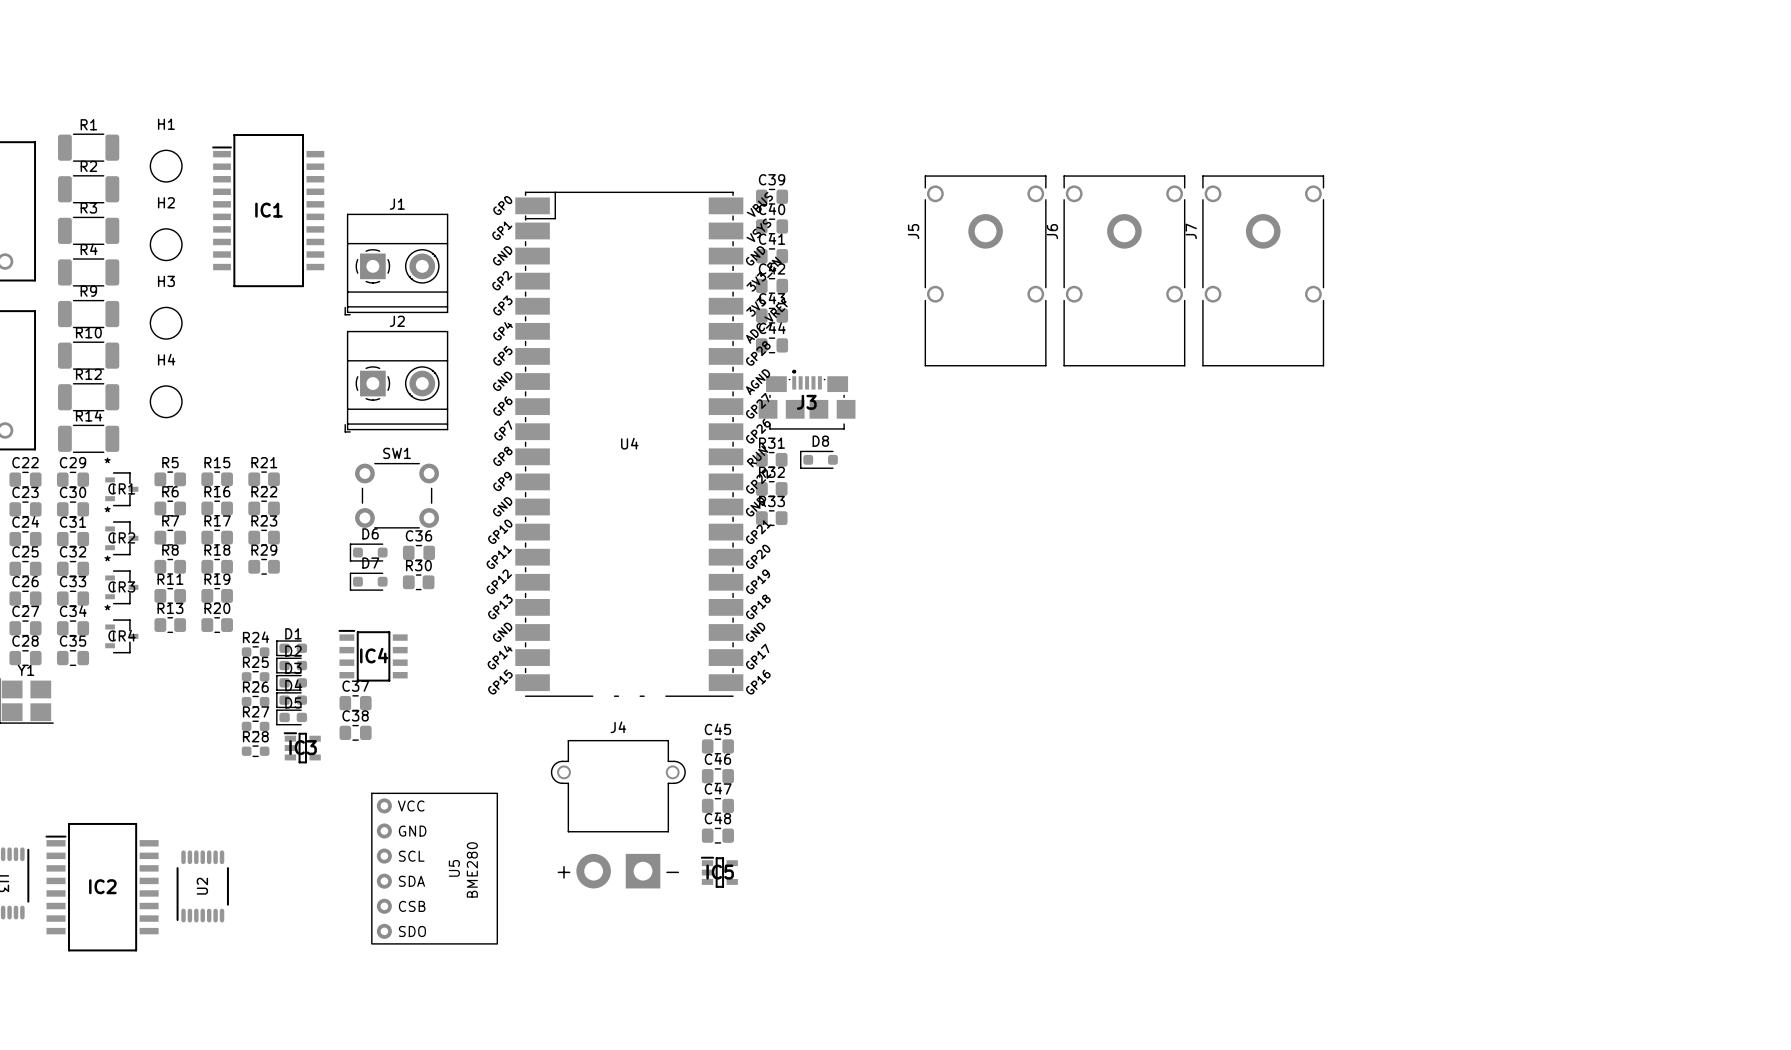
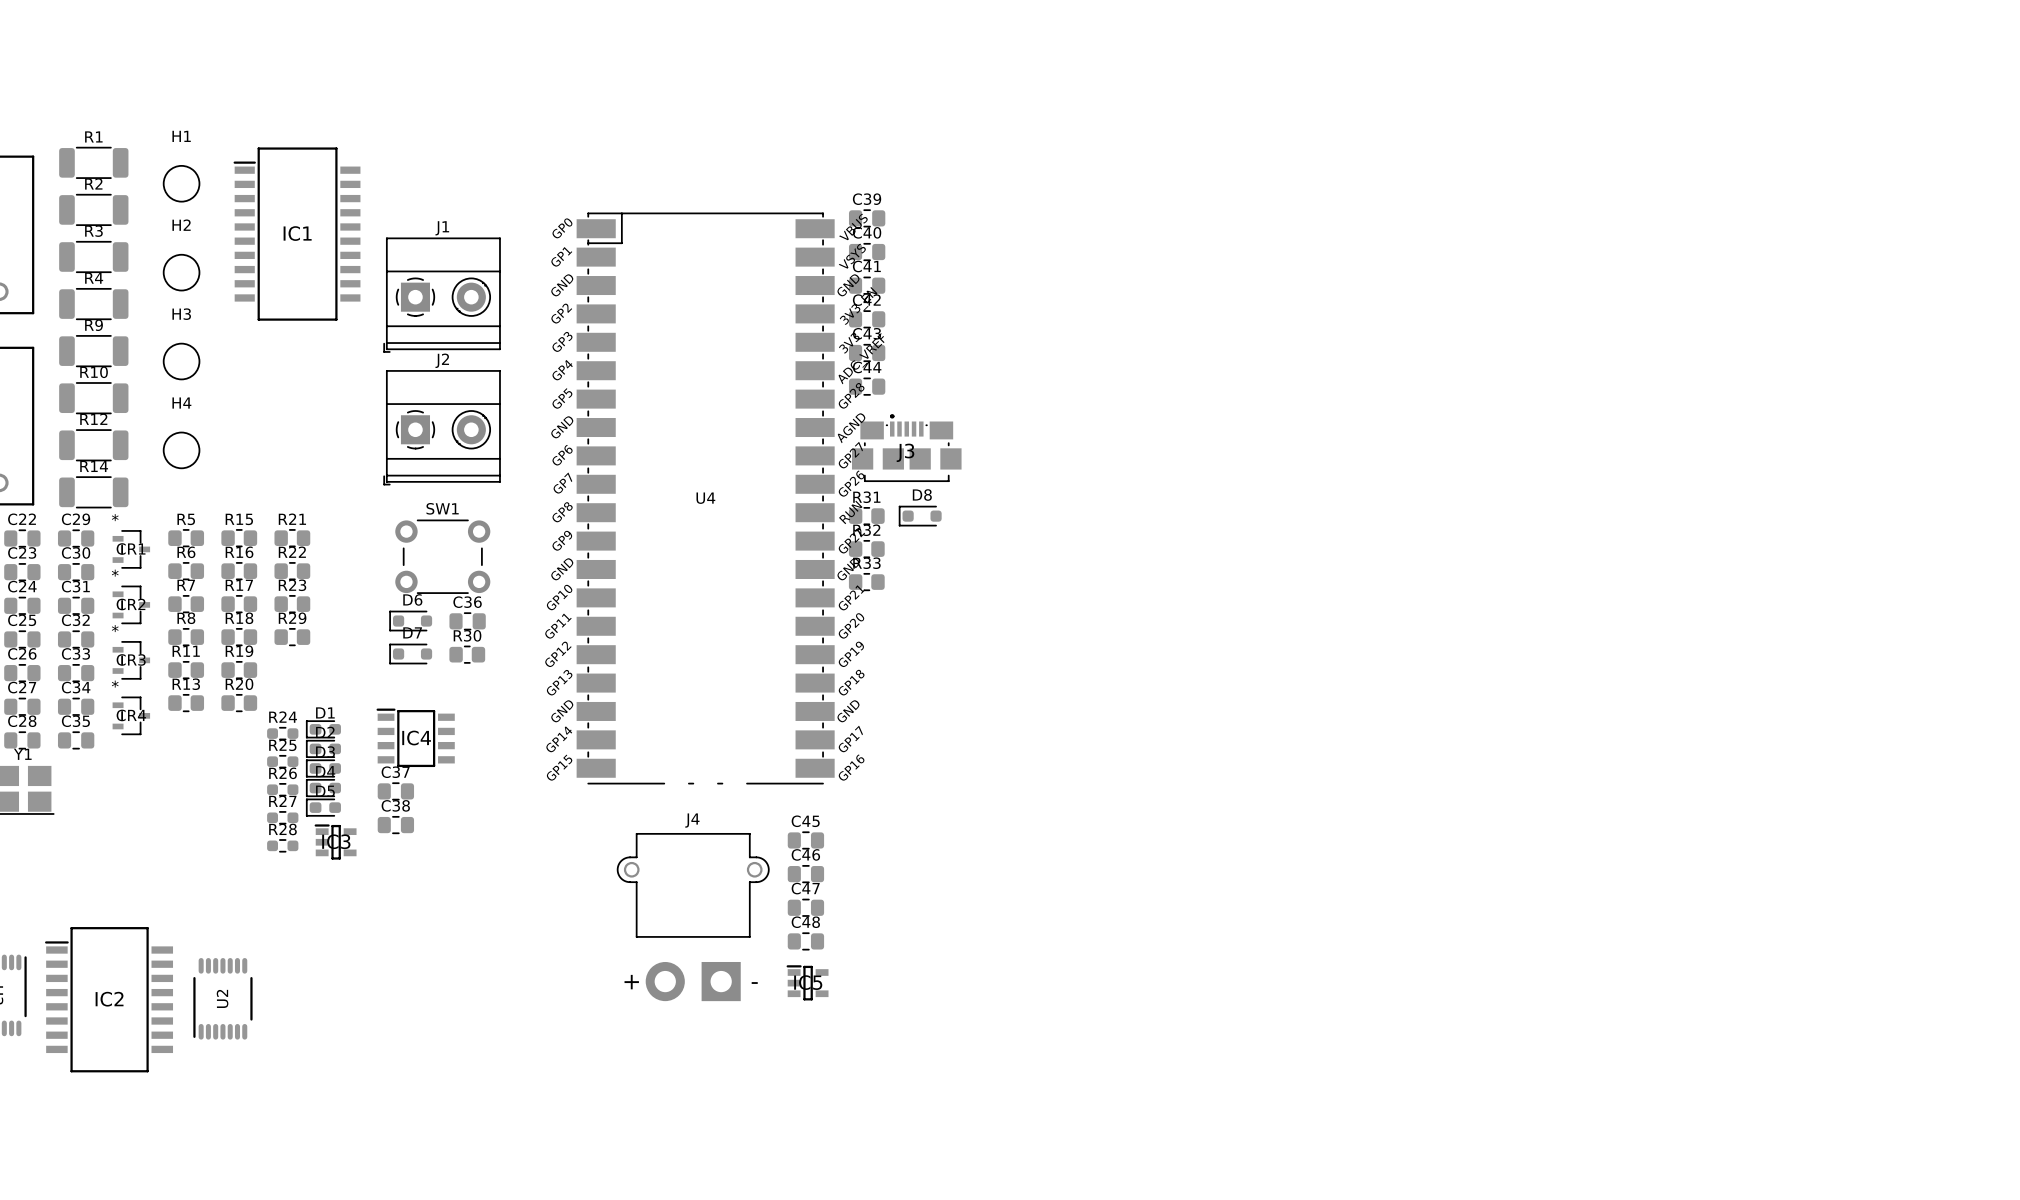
J5: (985, 270) -> none
J6: (1124, 270) -> none
J7: (1263, 270) -> none
U5: (434, 868) -> none

